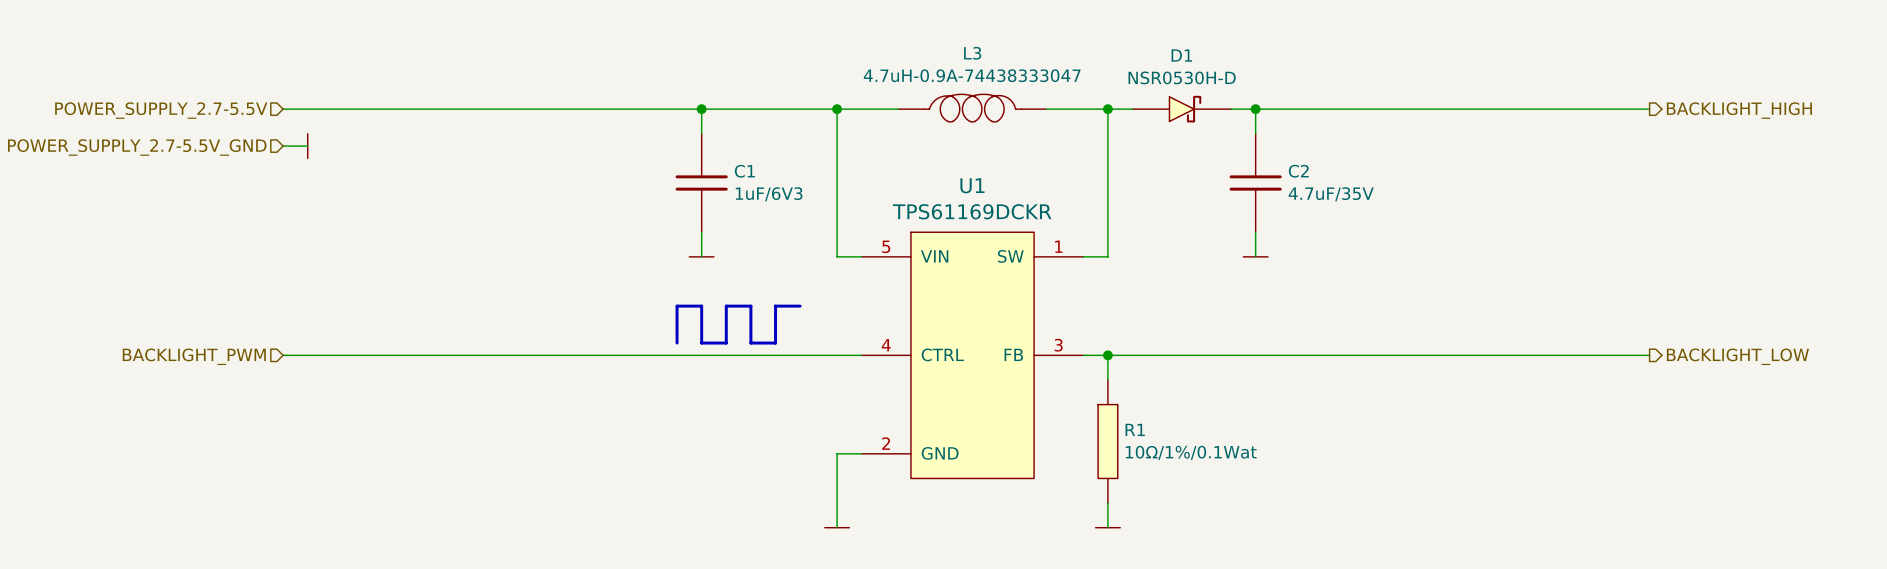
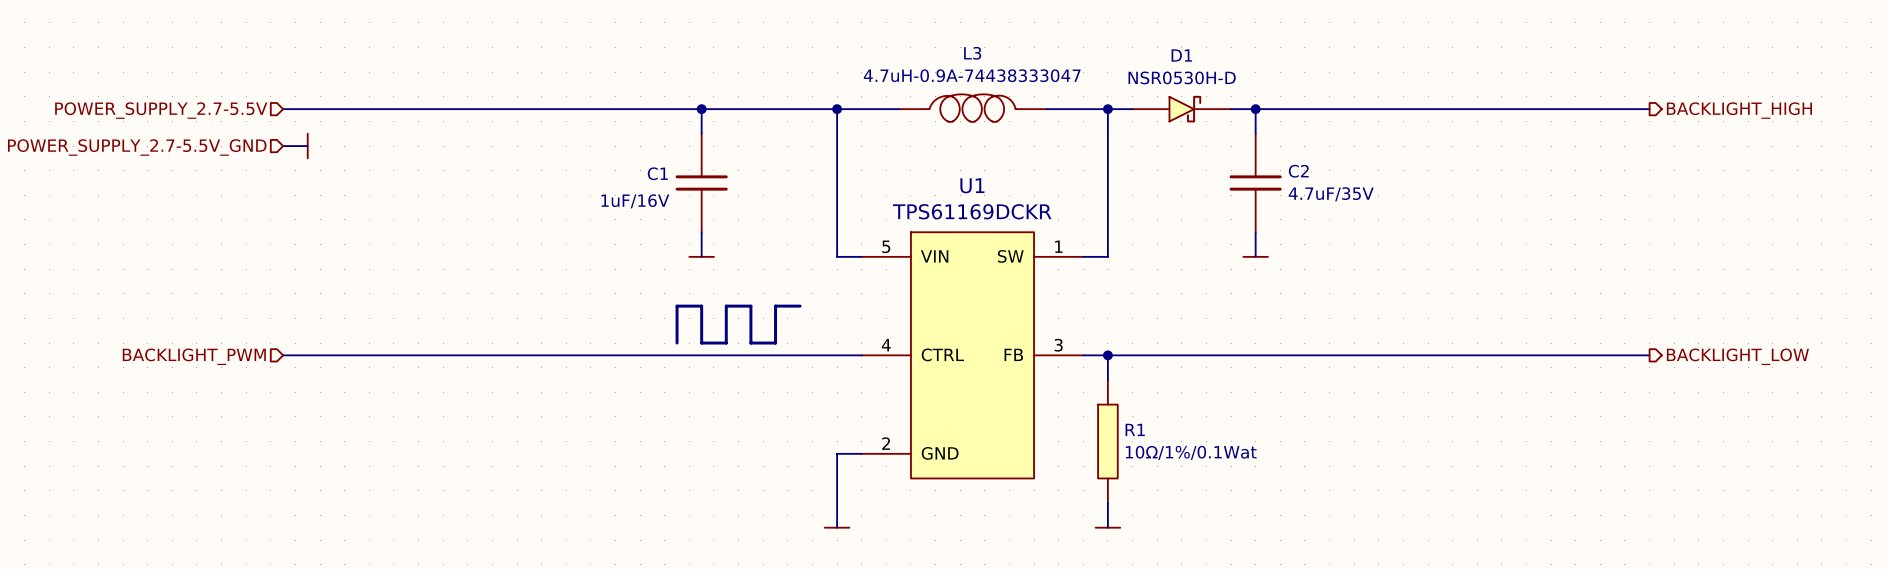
C1 name position: C1 (744, 171) -> C1 (657, 173)
C1 value: 1uF/6V3 (769, 194) -> 1uF/16V (635, 201)

